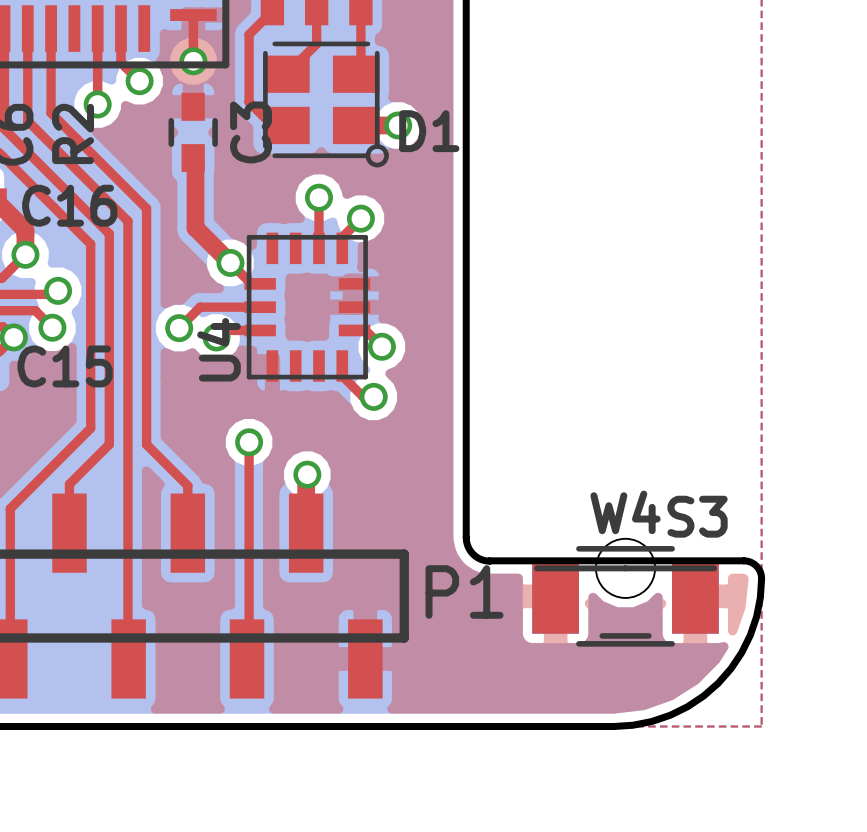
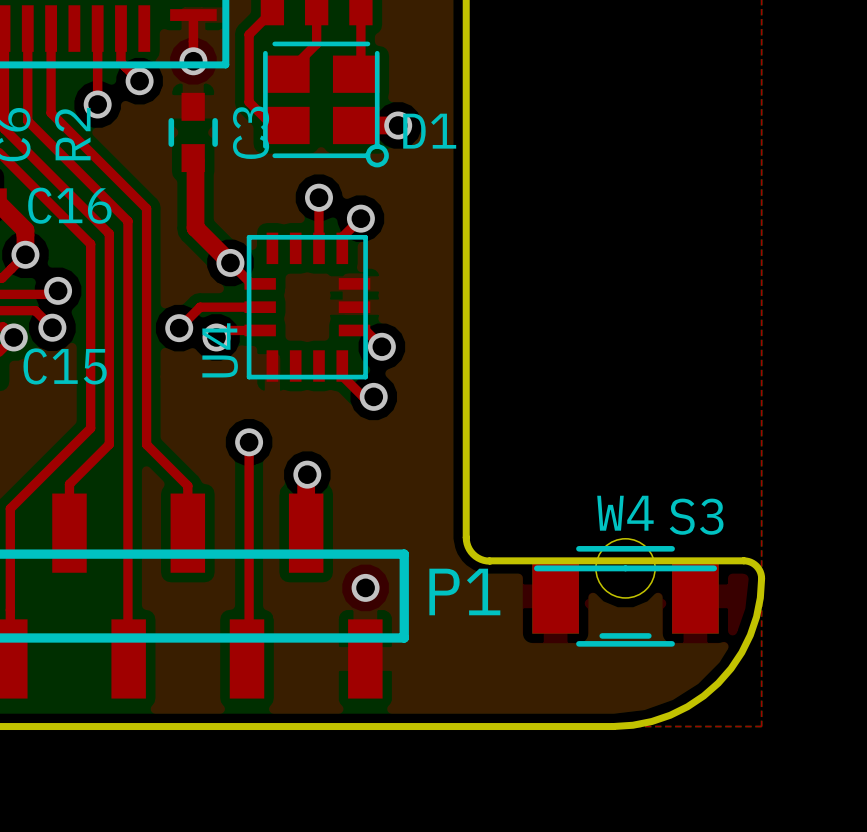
via: none -> (365, 587)

